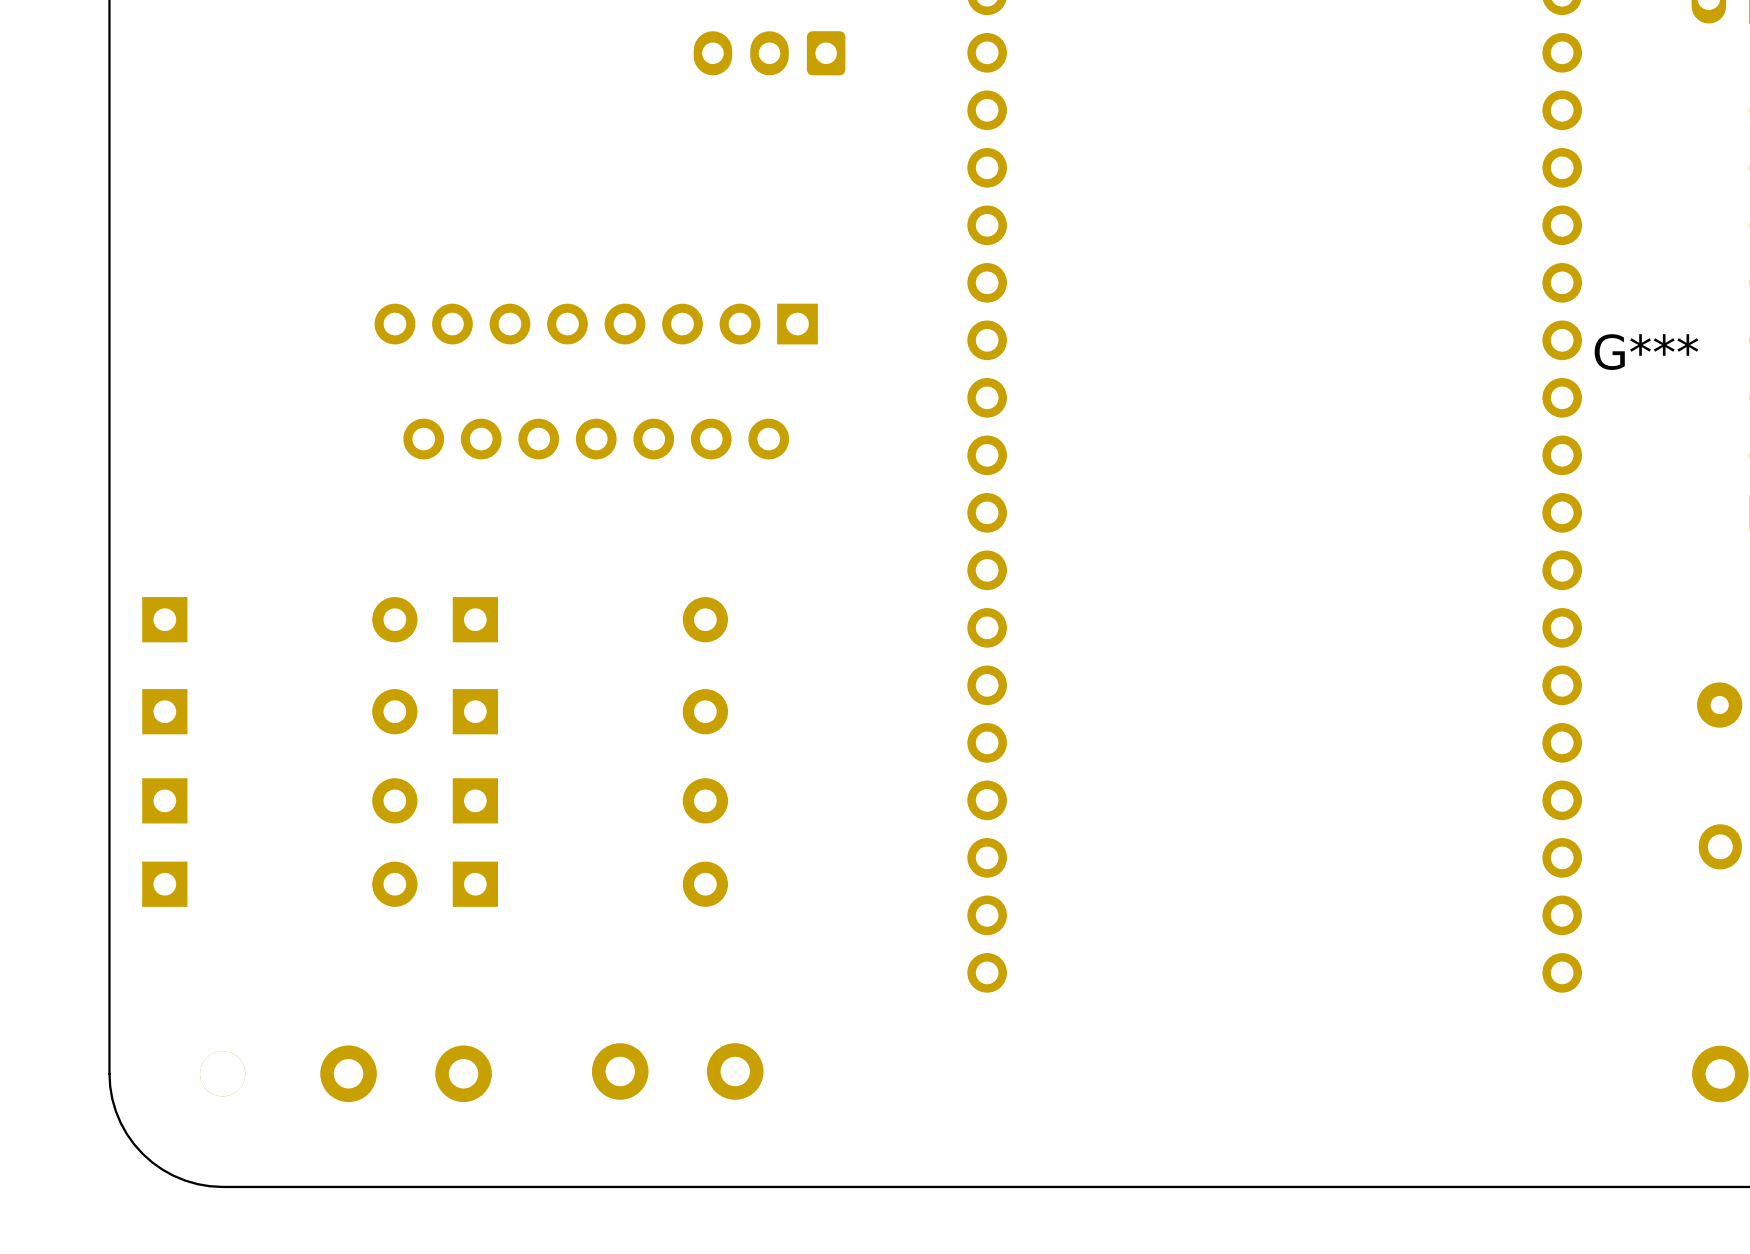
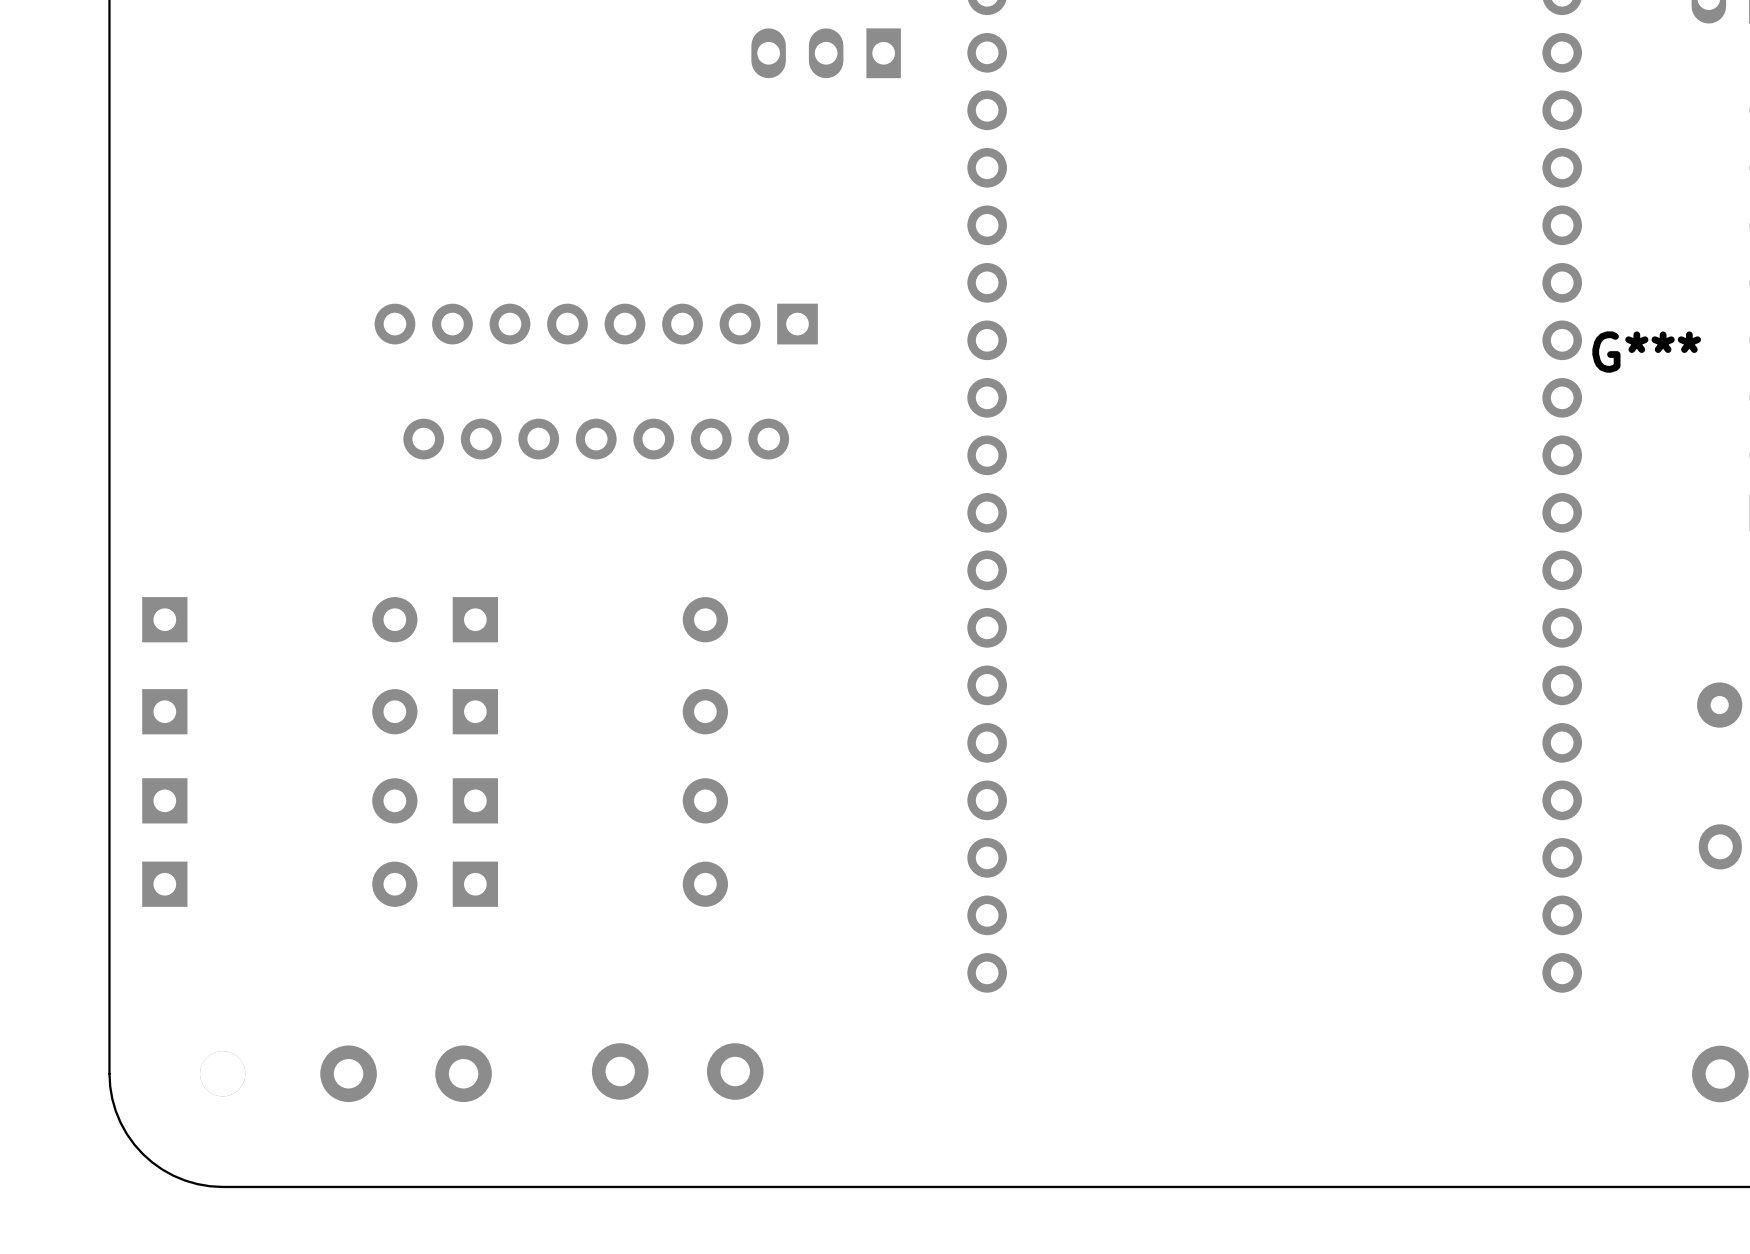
part: (769, 53) -> none
part: none -> (826, 53)

